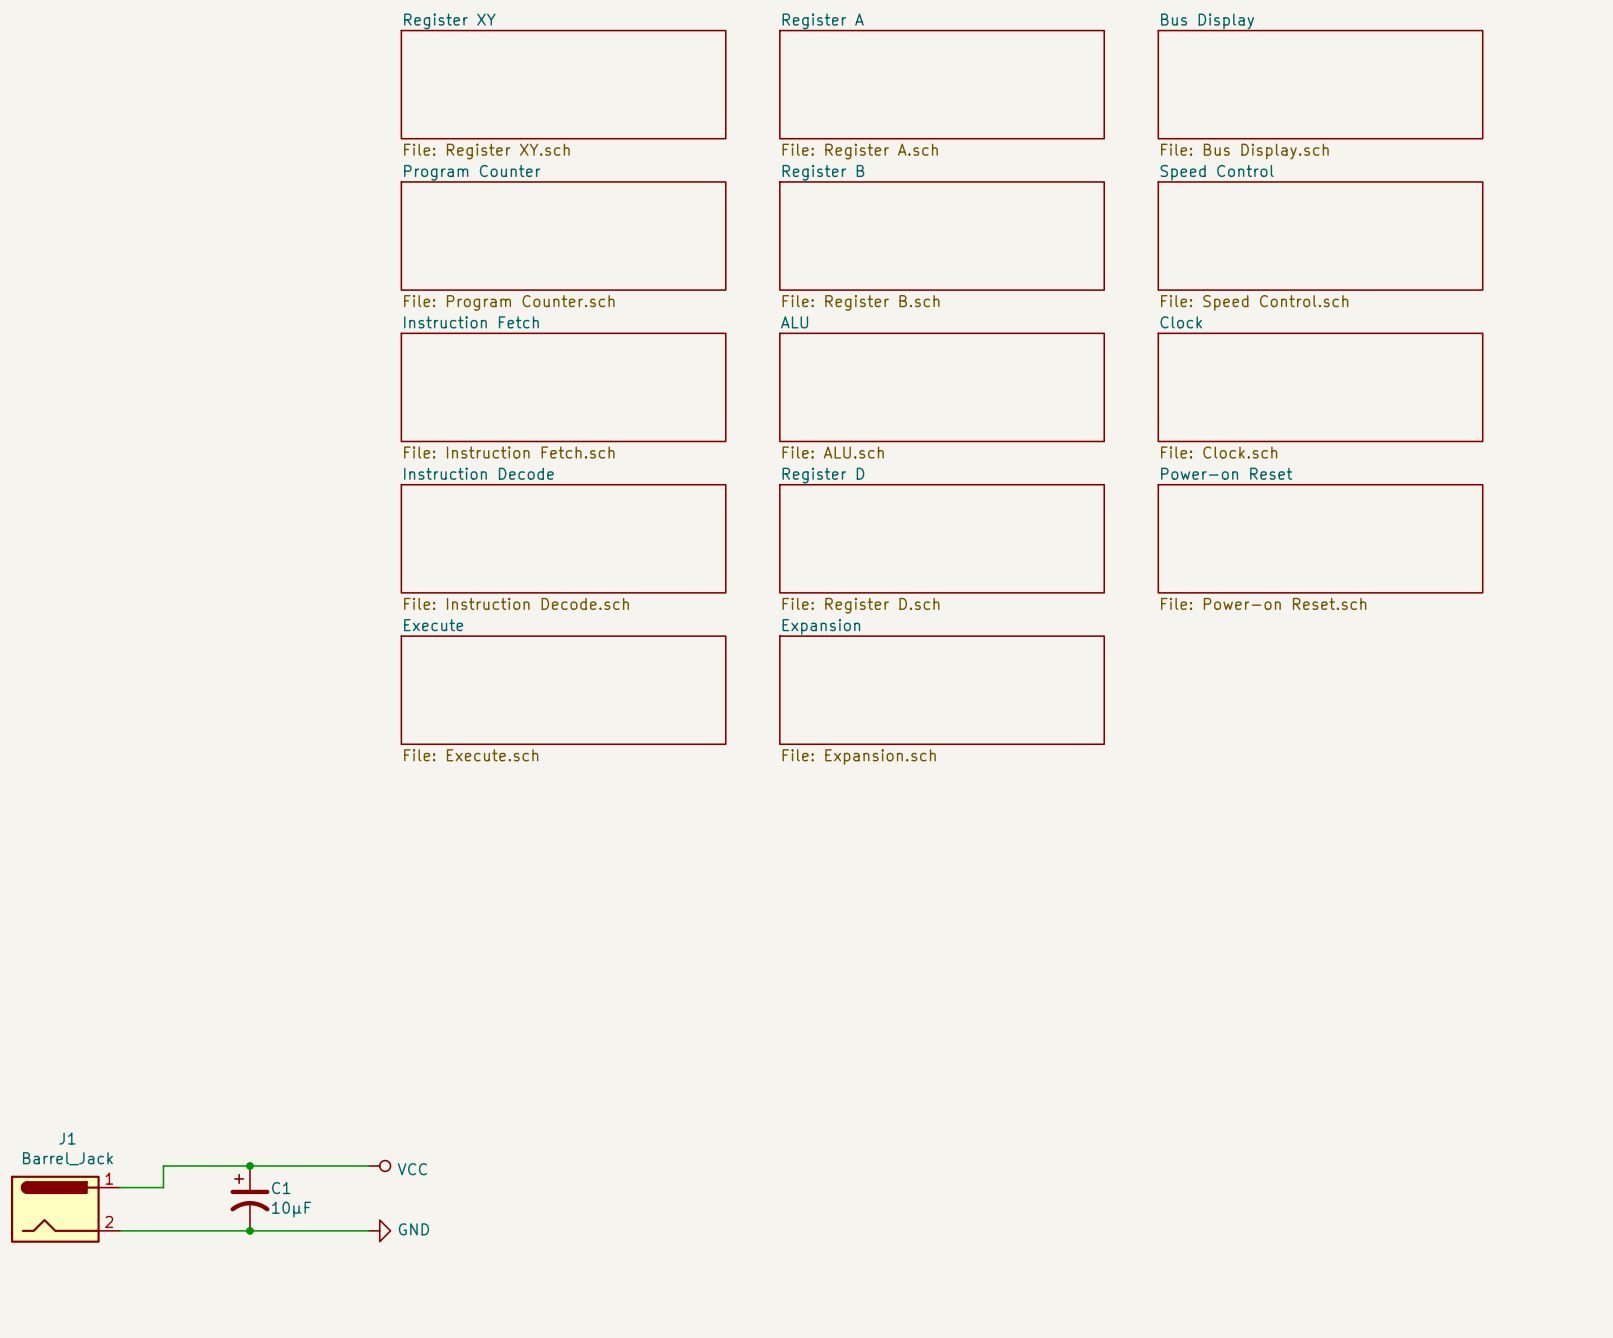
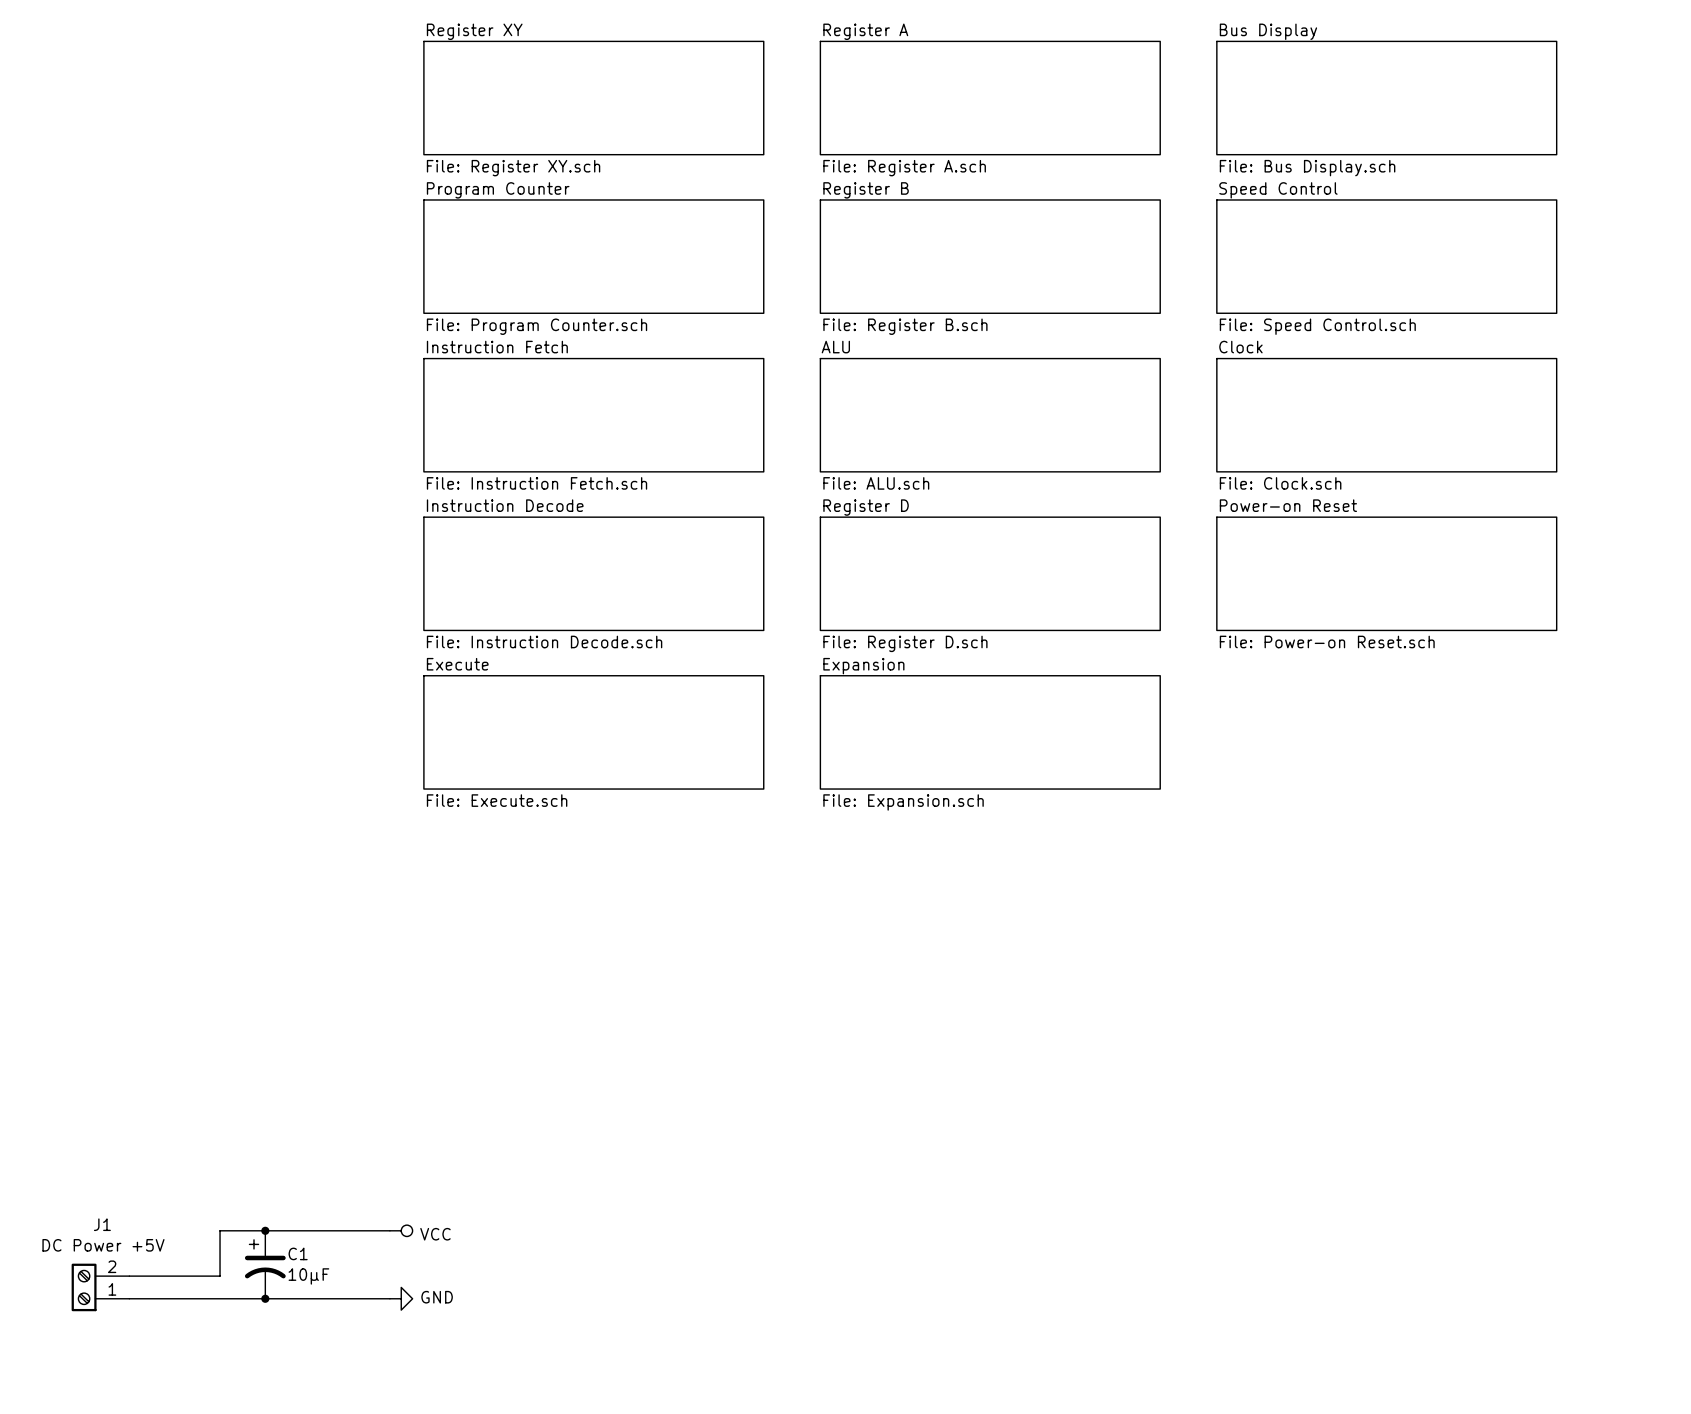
J1 value: Barrel_Jack (67, 1158) -> DC Power +5V (103, 1245)
wire: (206, 1165) (163, 1165) (163, 1187) (120, 1187) -> (220, 1230) (220, 1276) (129, 1276)
J1 symbol: [10, 1175, 121, 1243] -> [71, 1263, 130, 1312]

